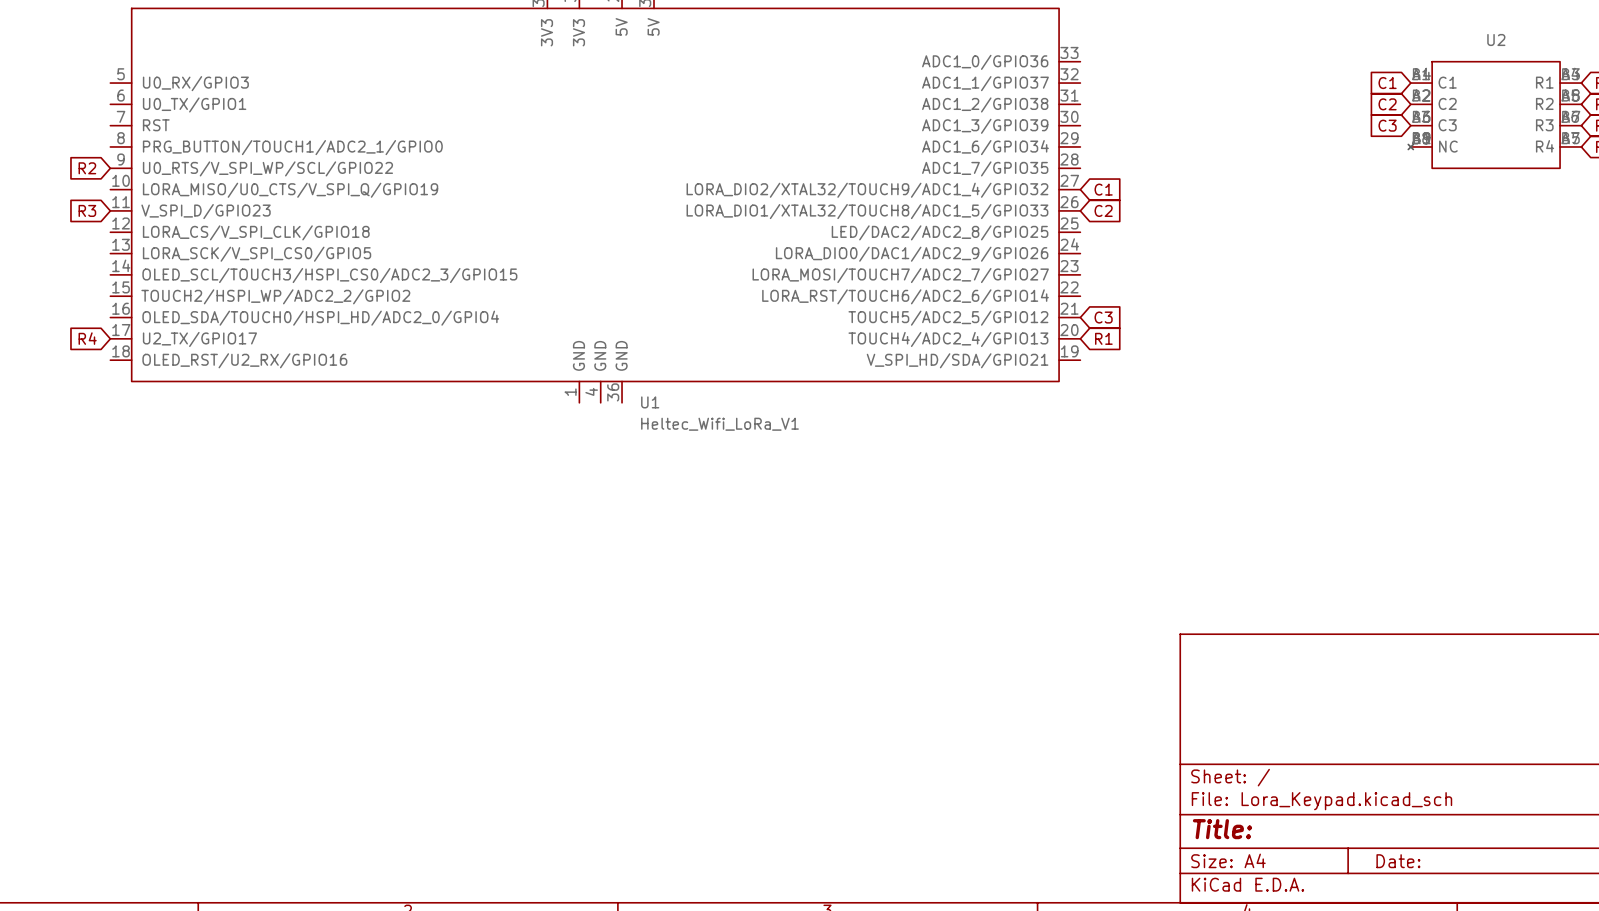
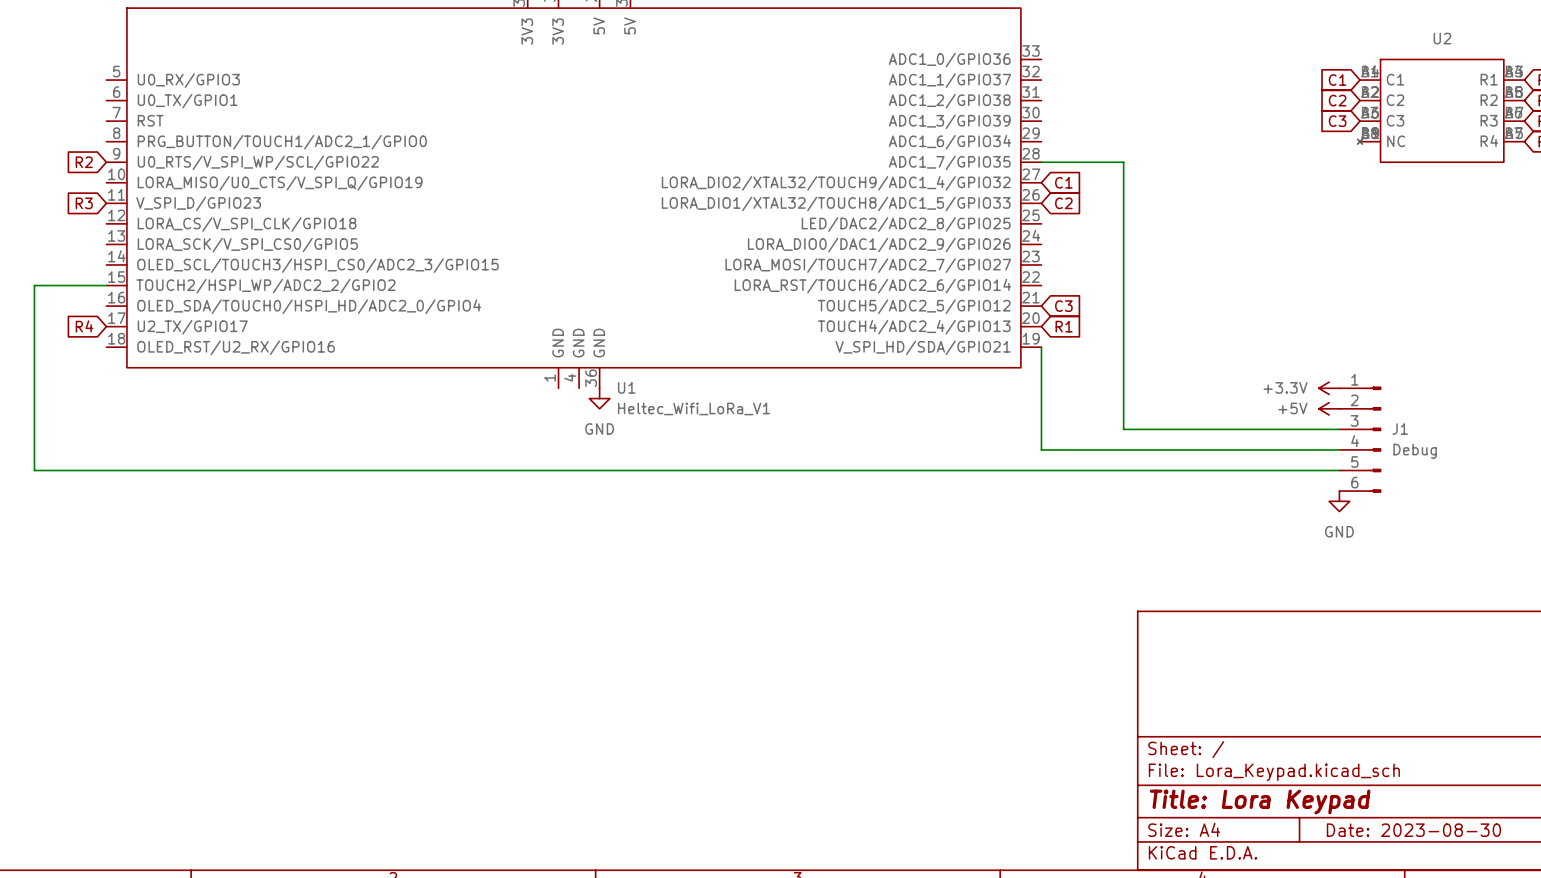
wire: none -> (1041, 162) (1123, 162) (1123, 429) (1339, 429)
wire: none -> (106, 285) (34, 285) (34, 470) (1339, 470)
wire: none -> (1041, 347) (1041, 449) (1339, 449)
power symbol: none -> +3.3V (1329, 388)
power symbol: none -> GND (599, 398)
power symbol: none -> +5V (1329, 408)
J1: none -> Debug (1360, 439)
power symbol: none -> GND (1339, 501)
title block: Title: (1222, 829) -> Title: Lora Keypad (1260, 801)
title block: Date: (1398, 861) -> Date: 2023-08-30 (1413, 830)

